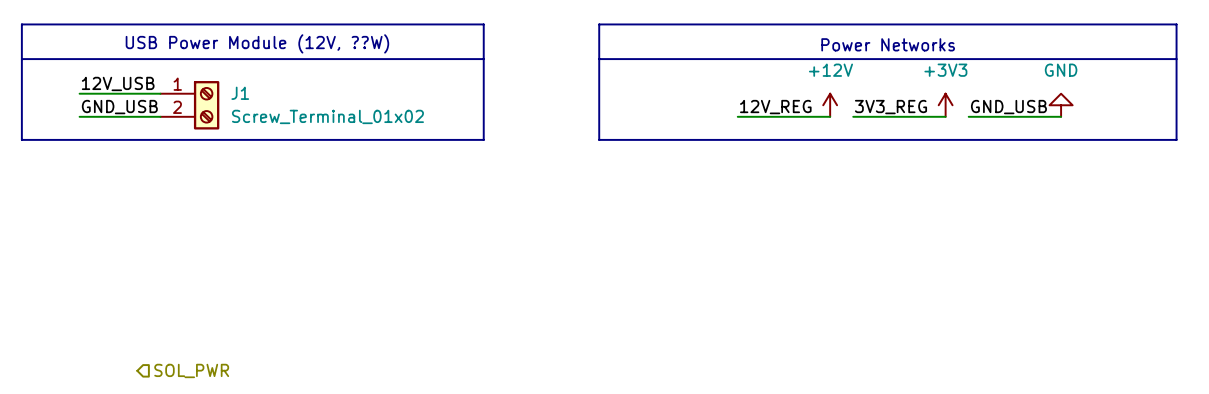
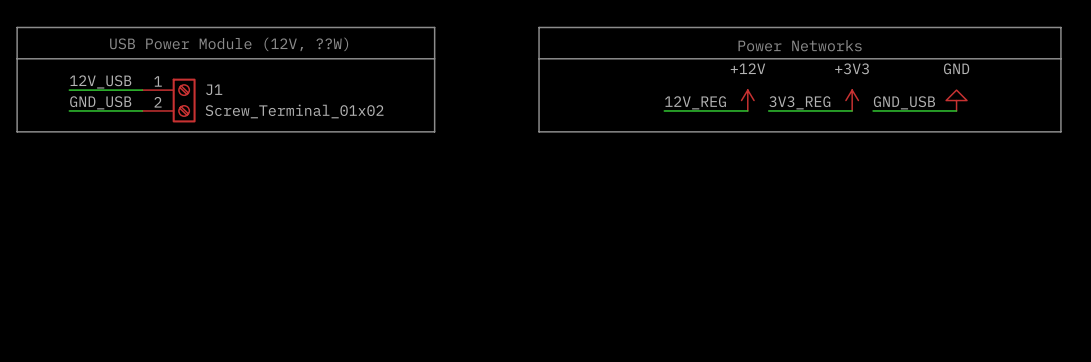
hierarchical label: SOL_PWR (191, 370) -> none

